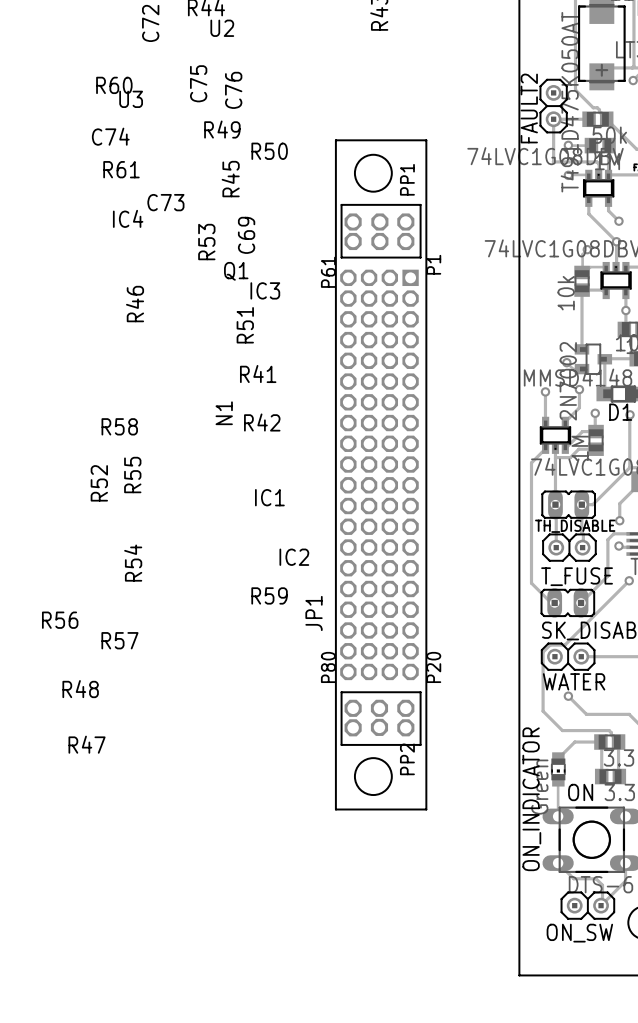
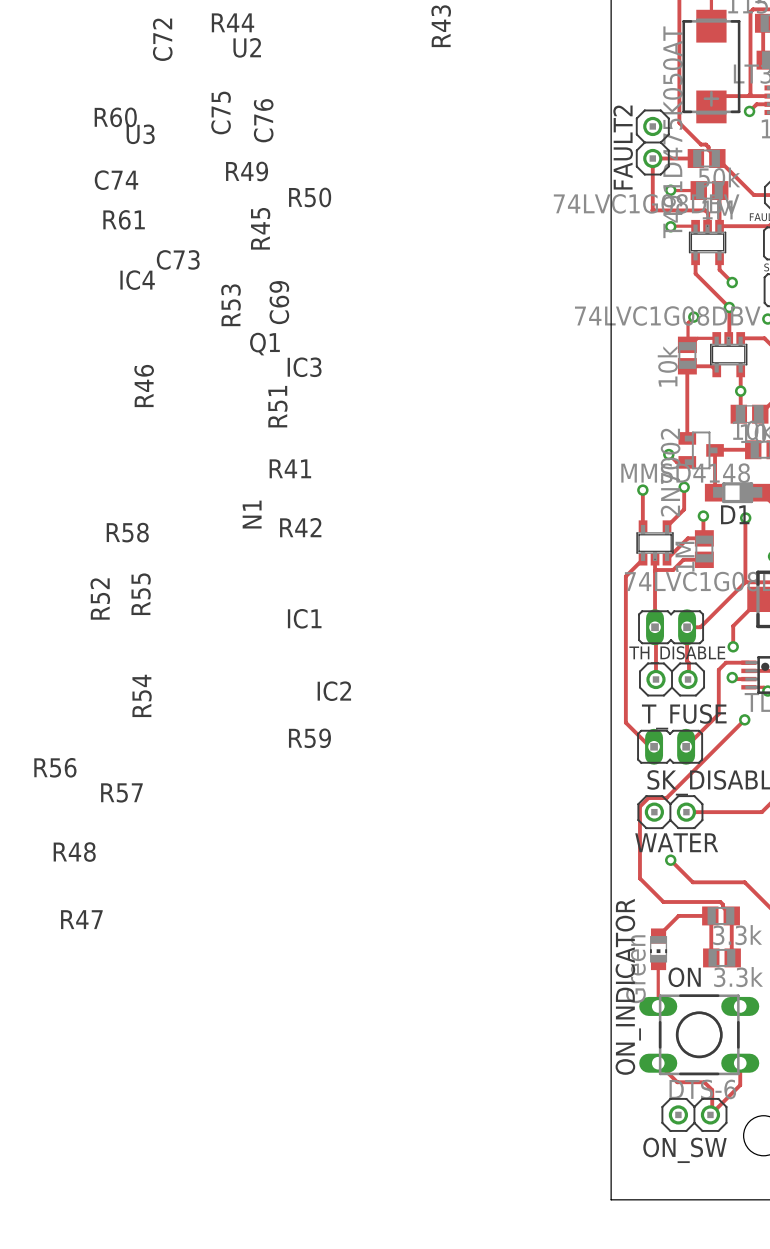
JP1: (381, 474) -> none

